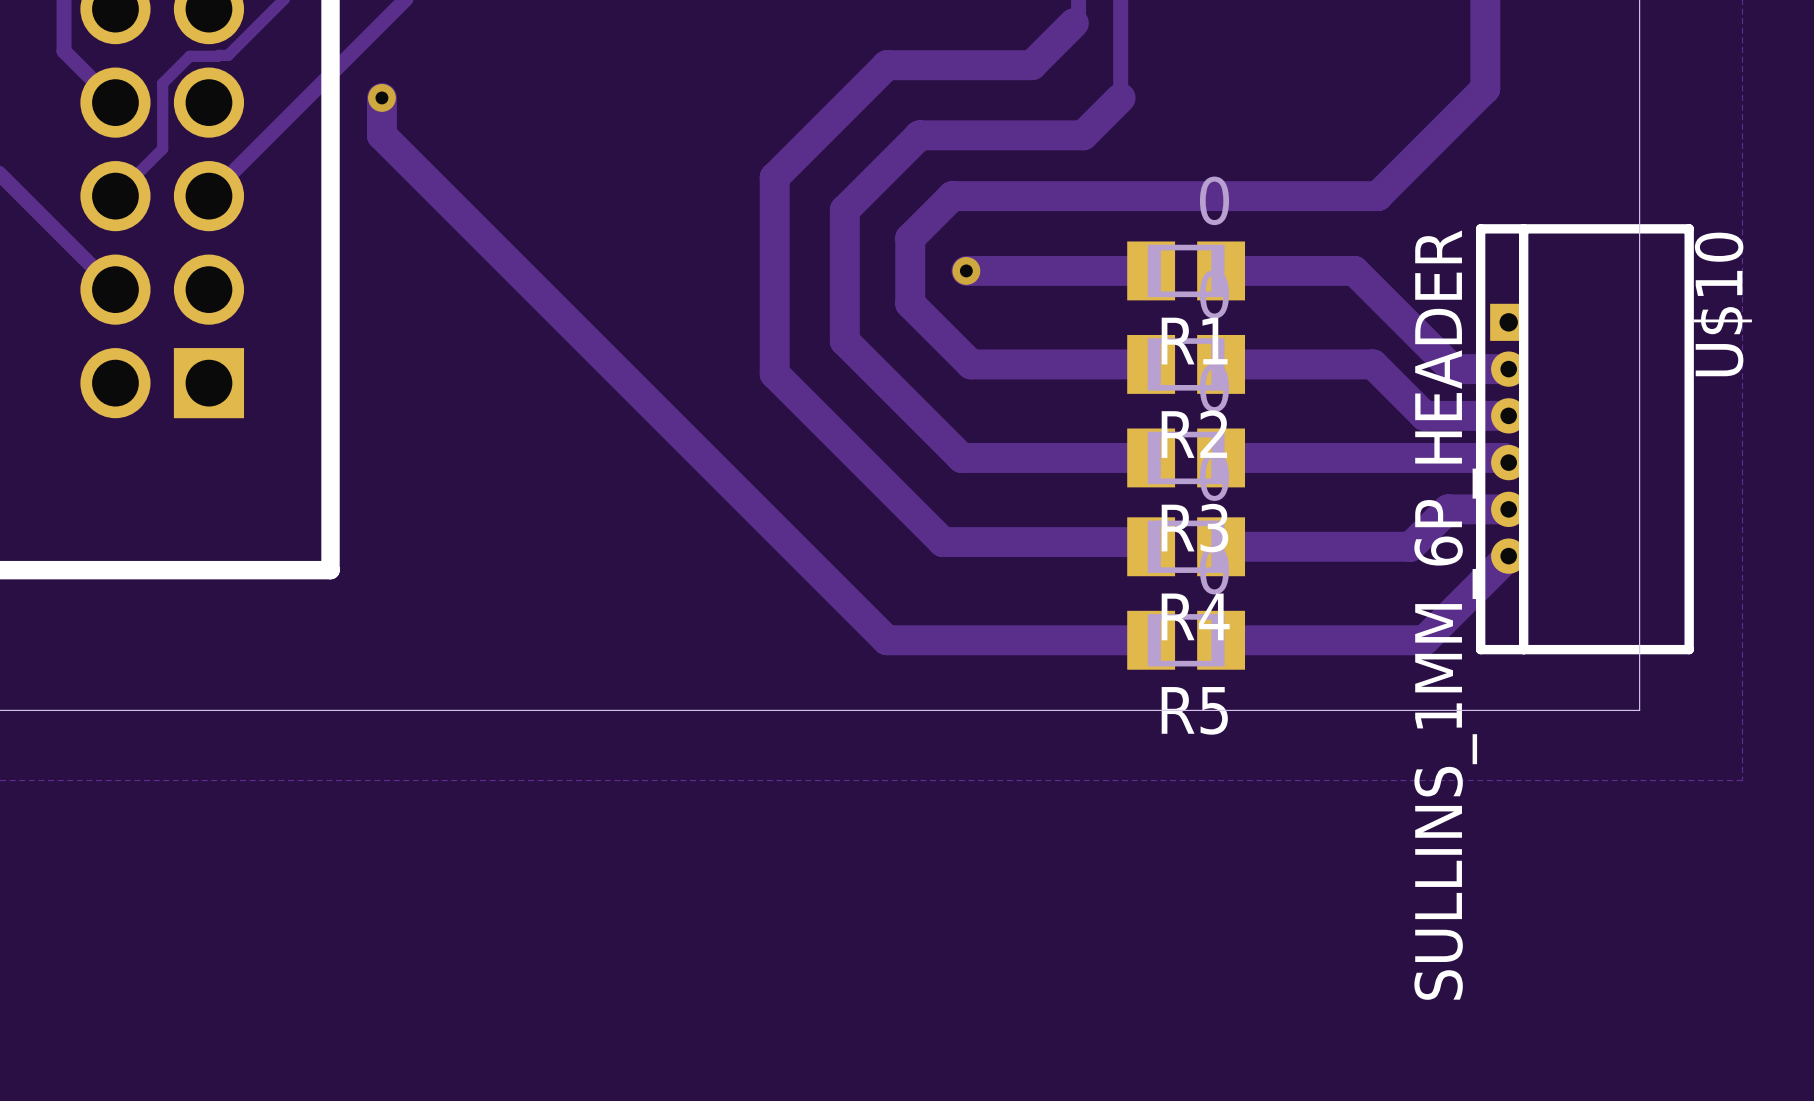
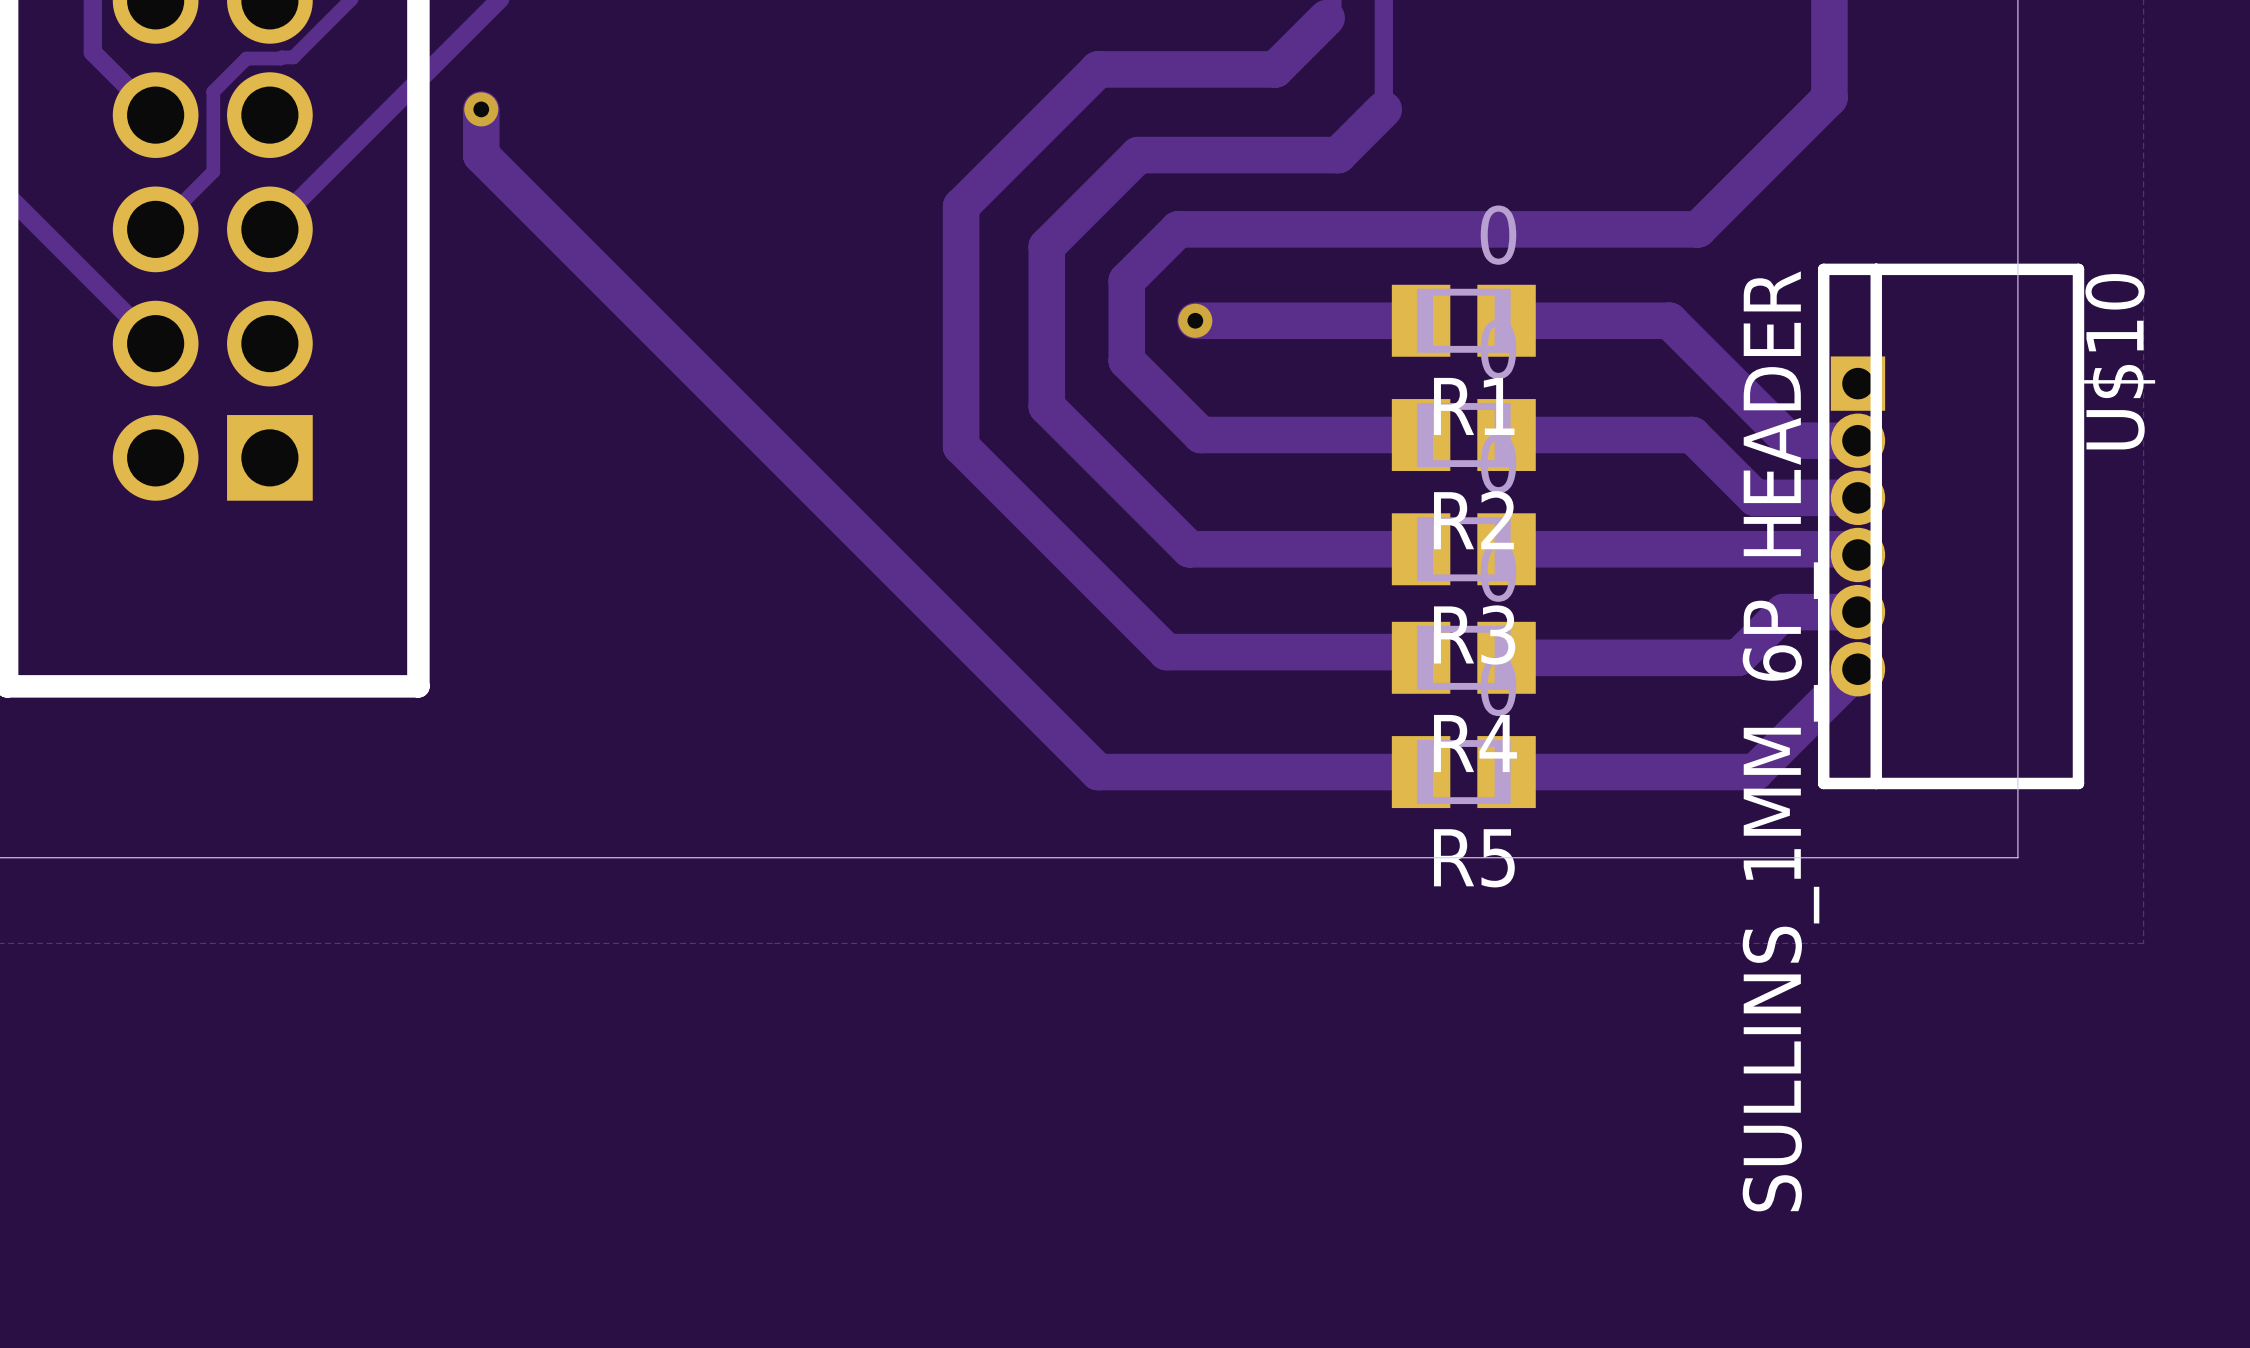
U$10 footprint: [1475, 224, 1694, 655] -> [1817, 263, 2085, 790]

